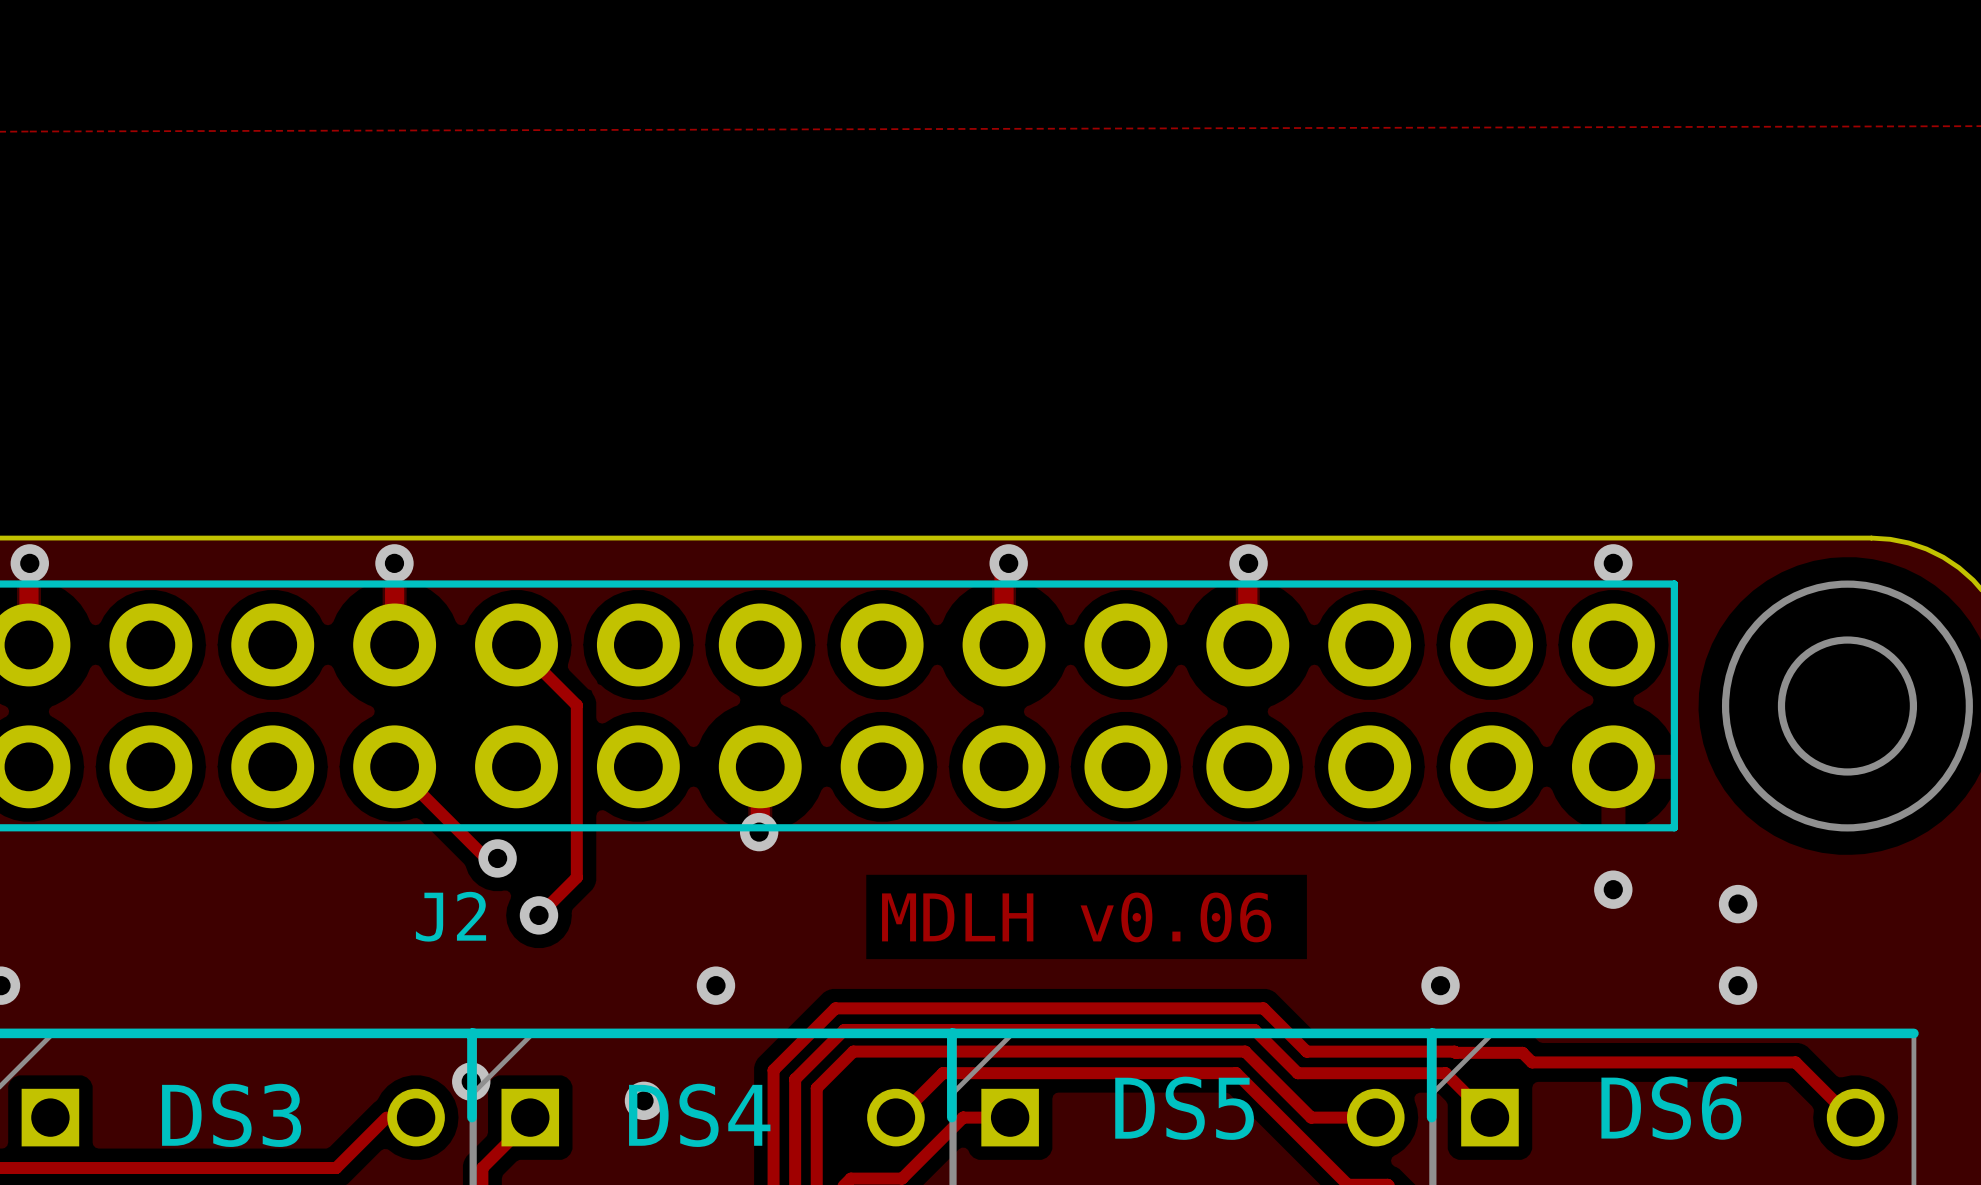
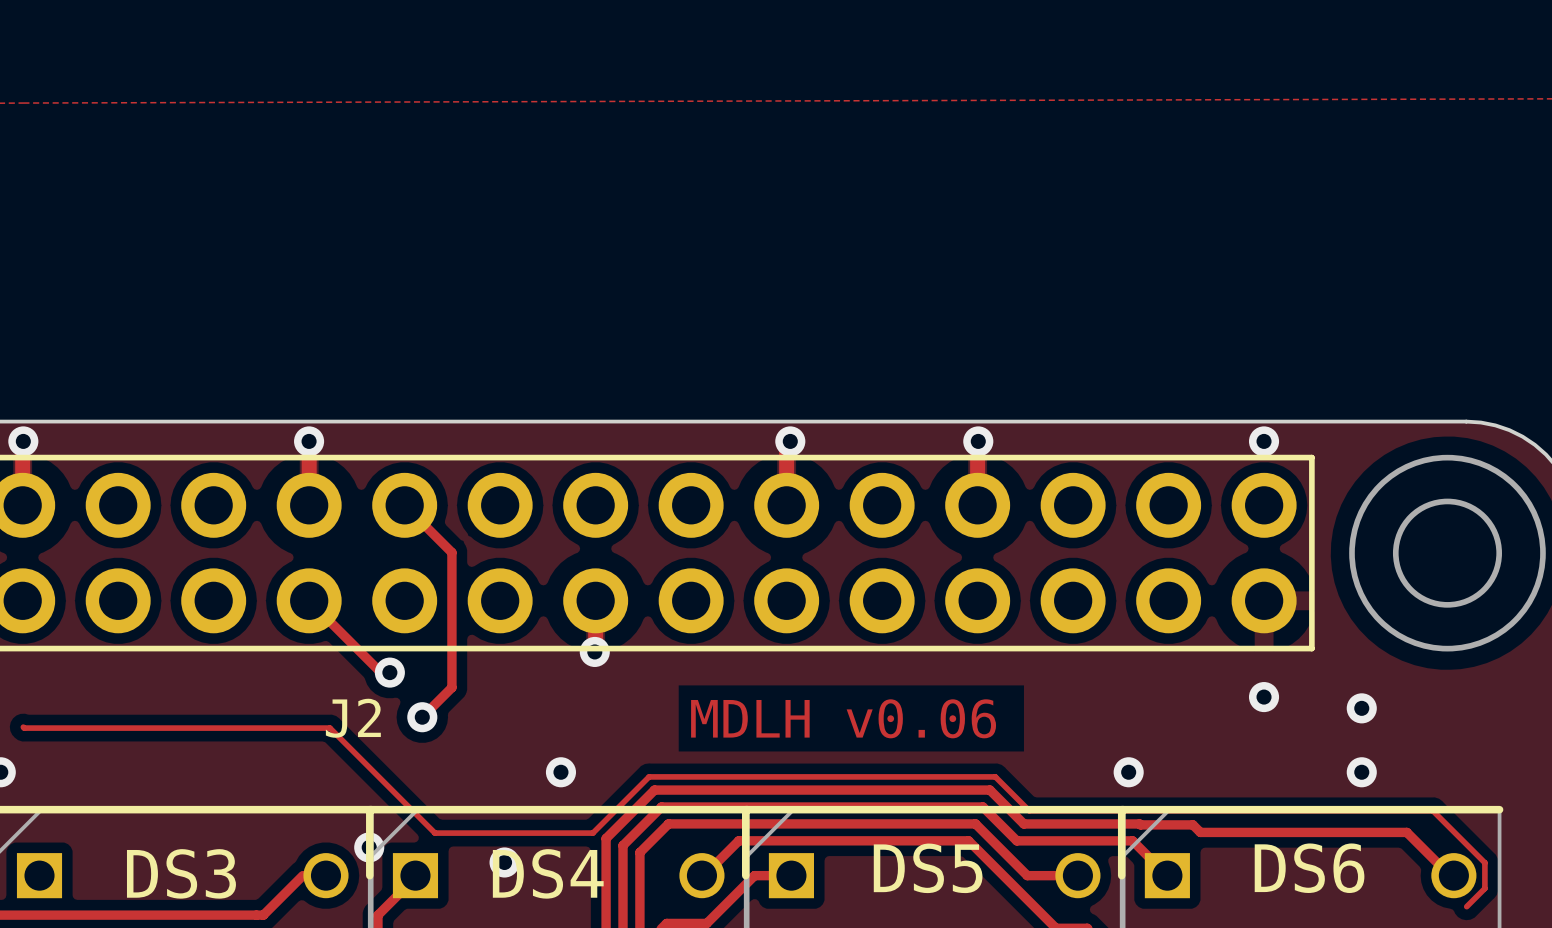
track: none -> (23, 727) (329, 728) (434, 833) (592, 833) (649, 776) (995, 776) (1029, 810) (1432, 810) (1484, 862) (1484, 888) (1466, 906)

